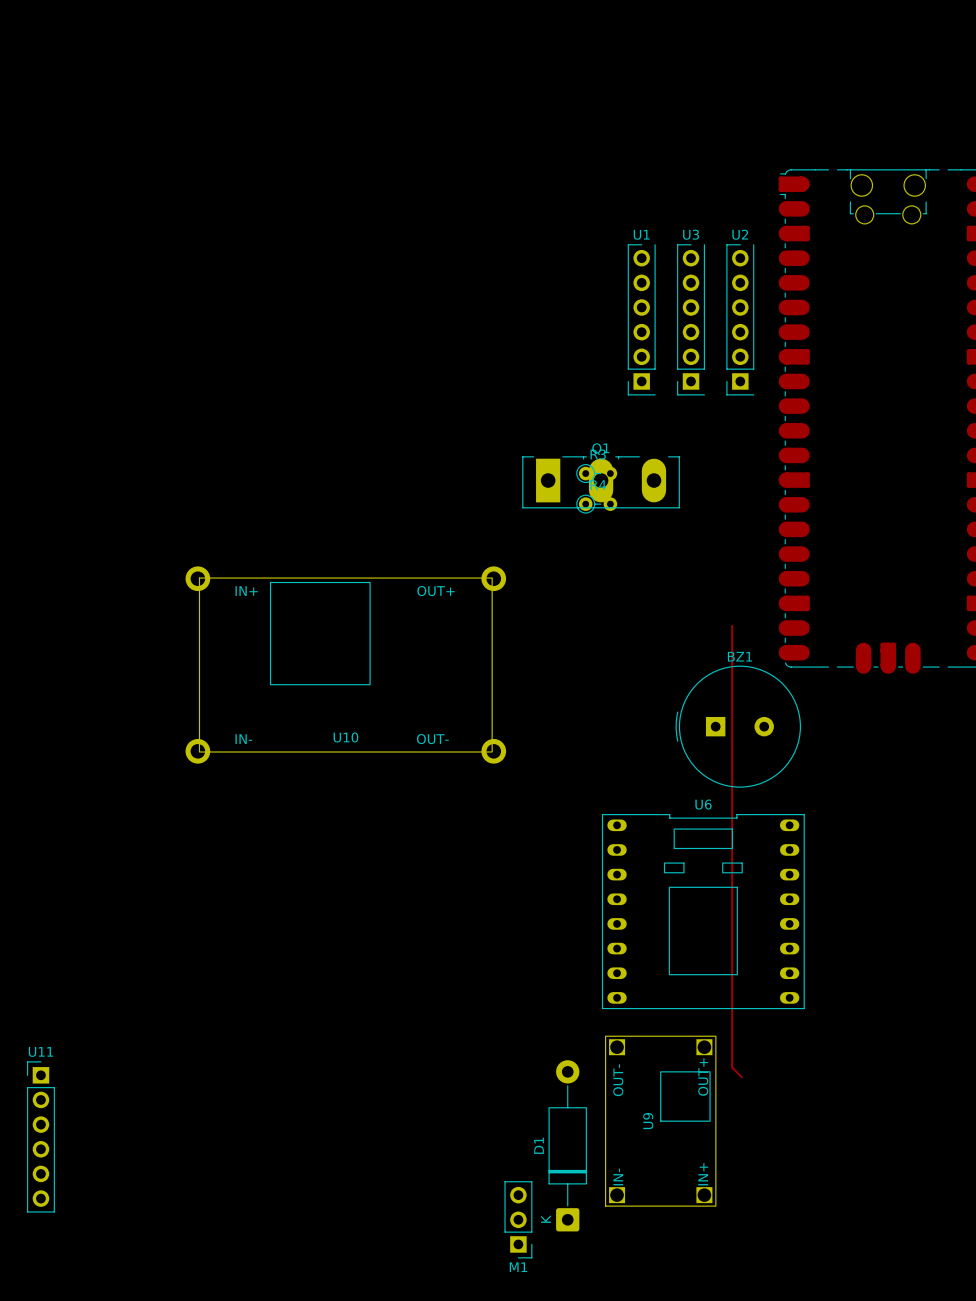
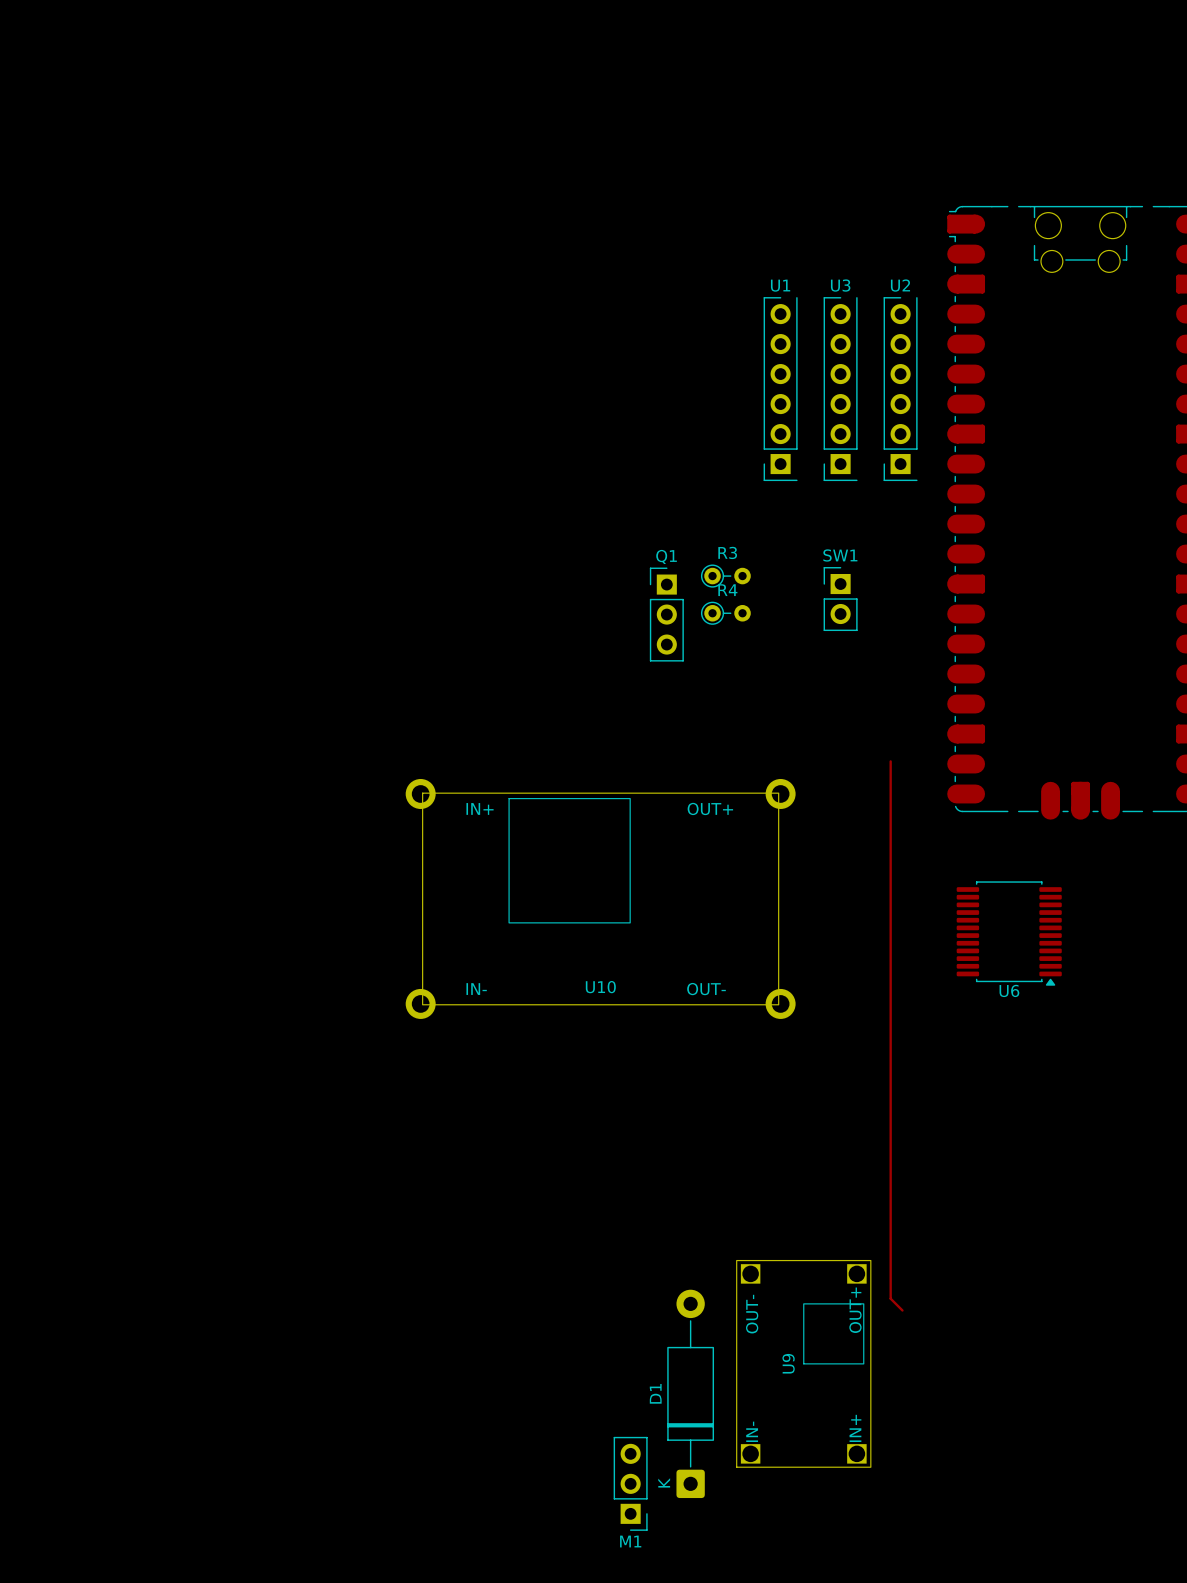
Q1 footprint: [522, 456, 680, 509] -> [649, 567, 684, 662]
SW1: none -> (840, 599)
U10 position: (345, 665) -> (600, 898)
BZ1: (738, 726) -> none
U6 name position: U6 (703, 804) -> U6 (1009, 990)
U6 footprint: [601, 814, 805, 1010] -> [956, 881, 1062, 986]
U11: (40, 1136) -> none

